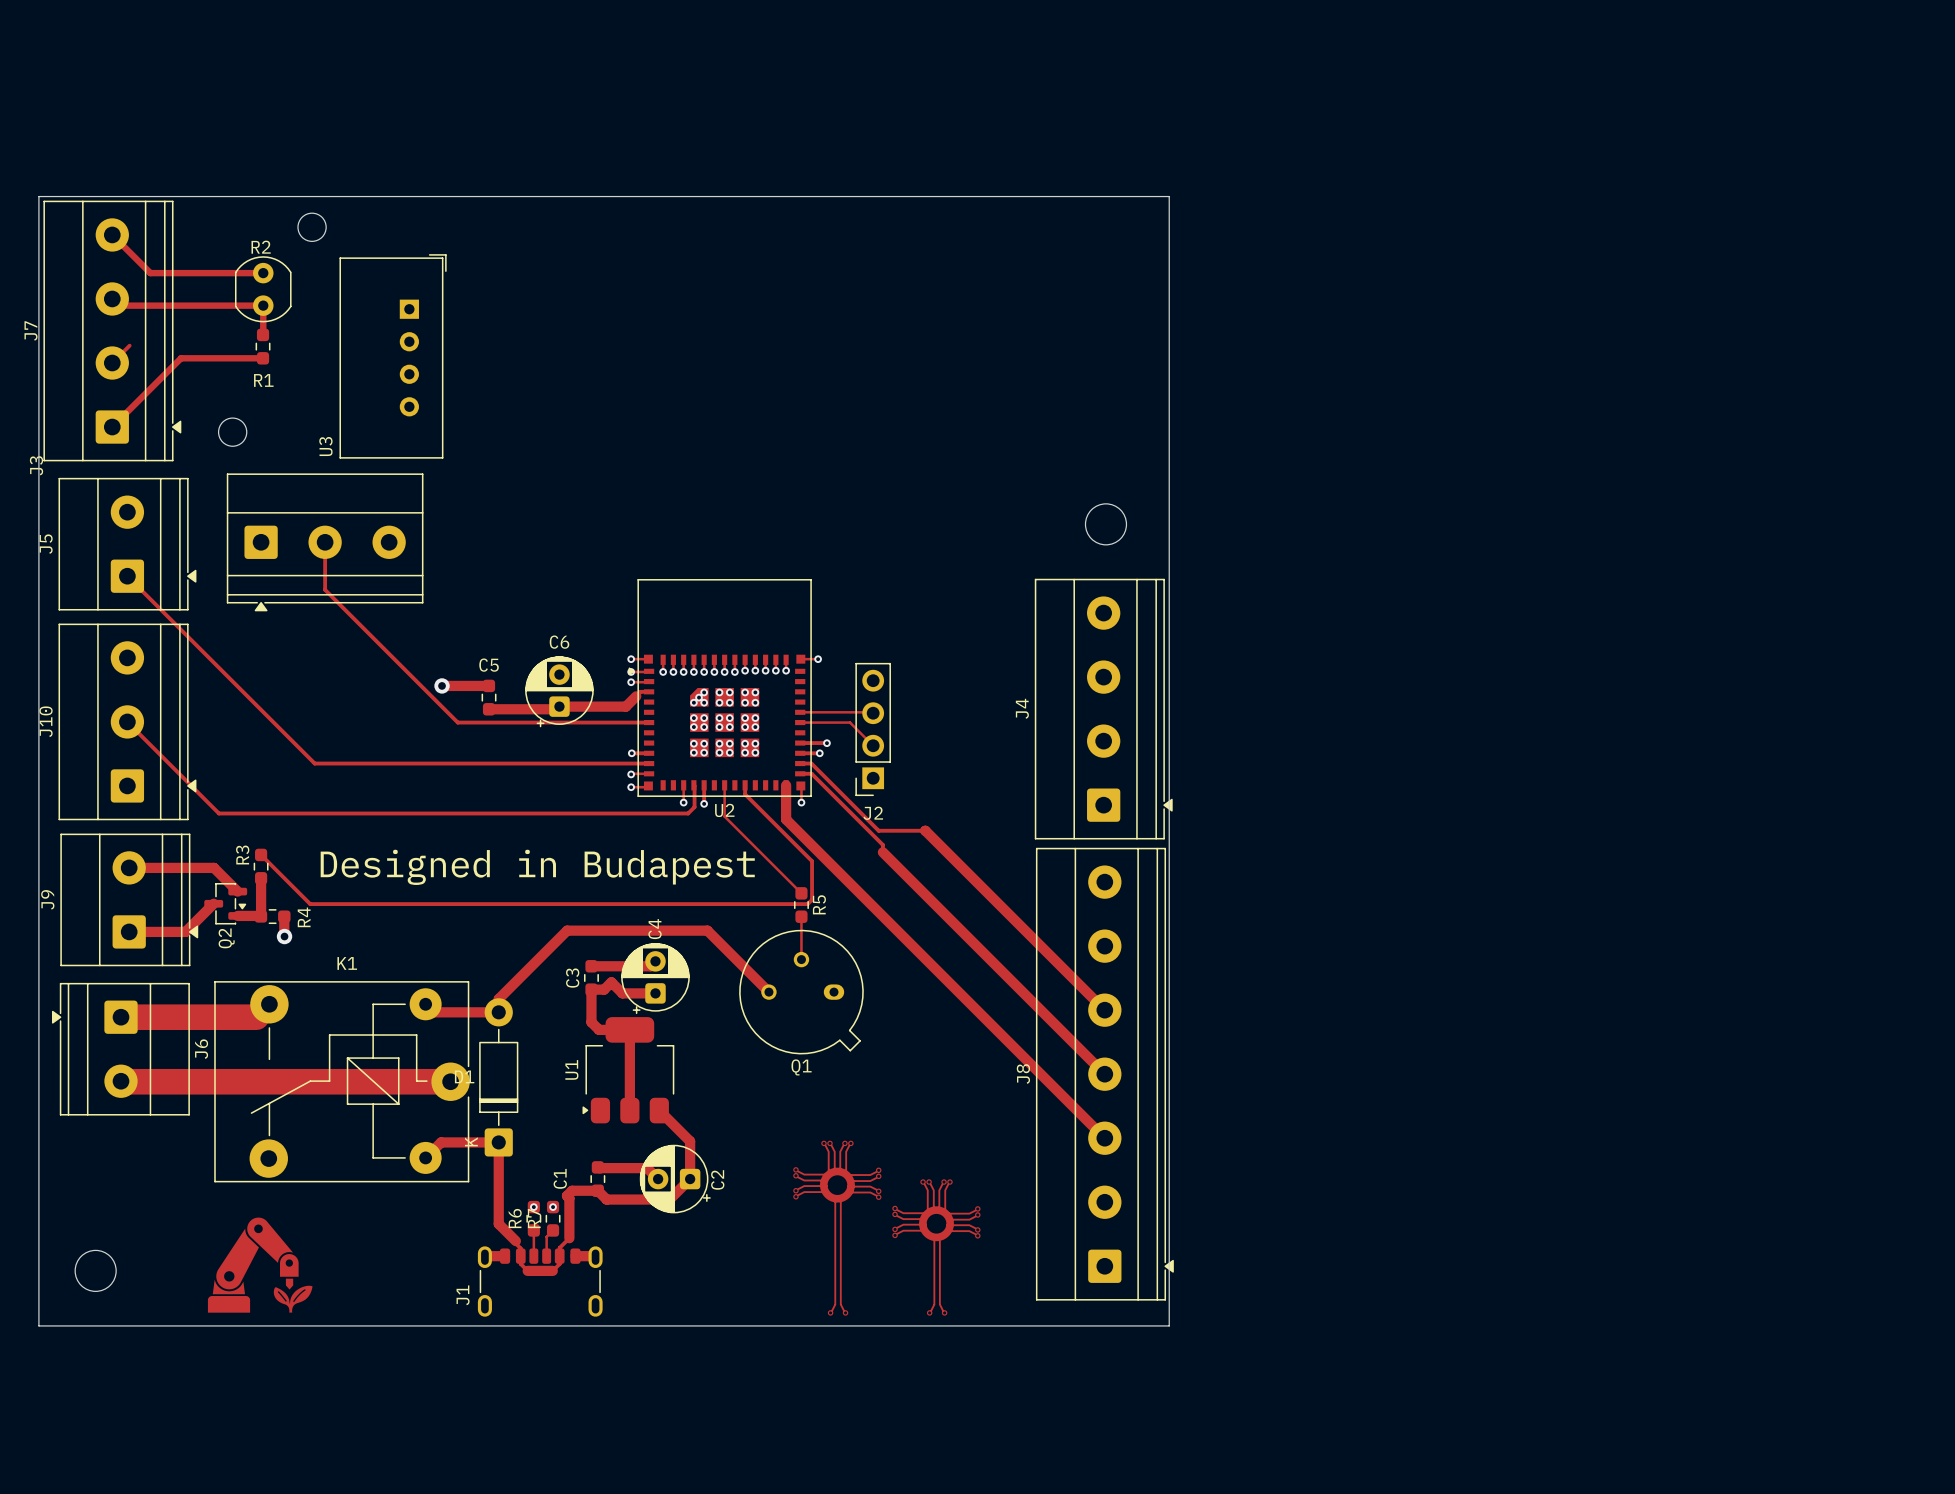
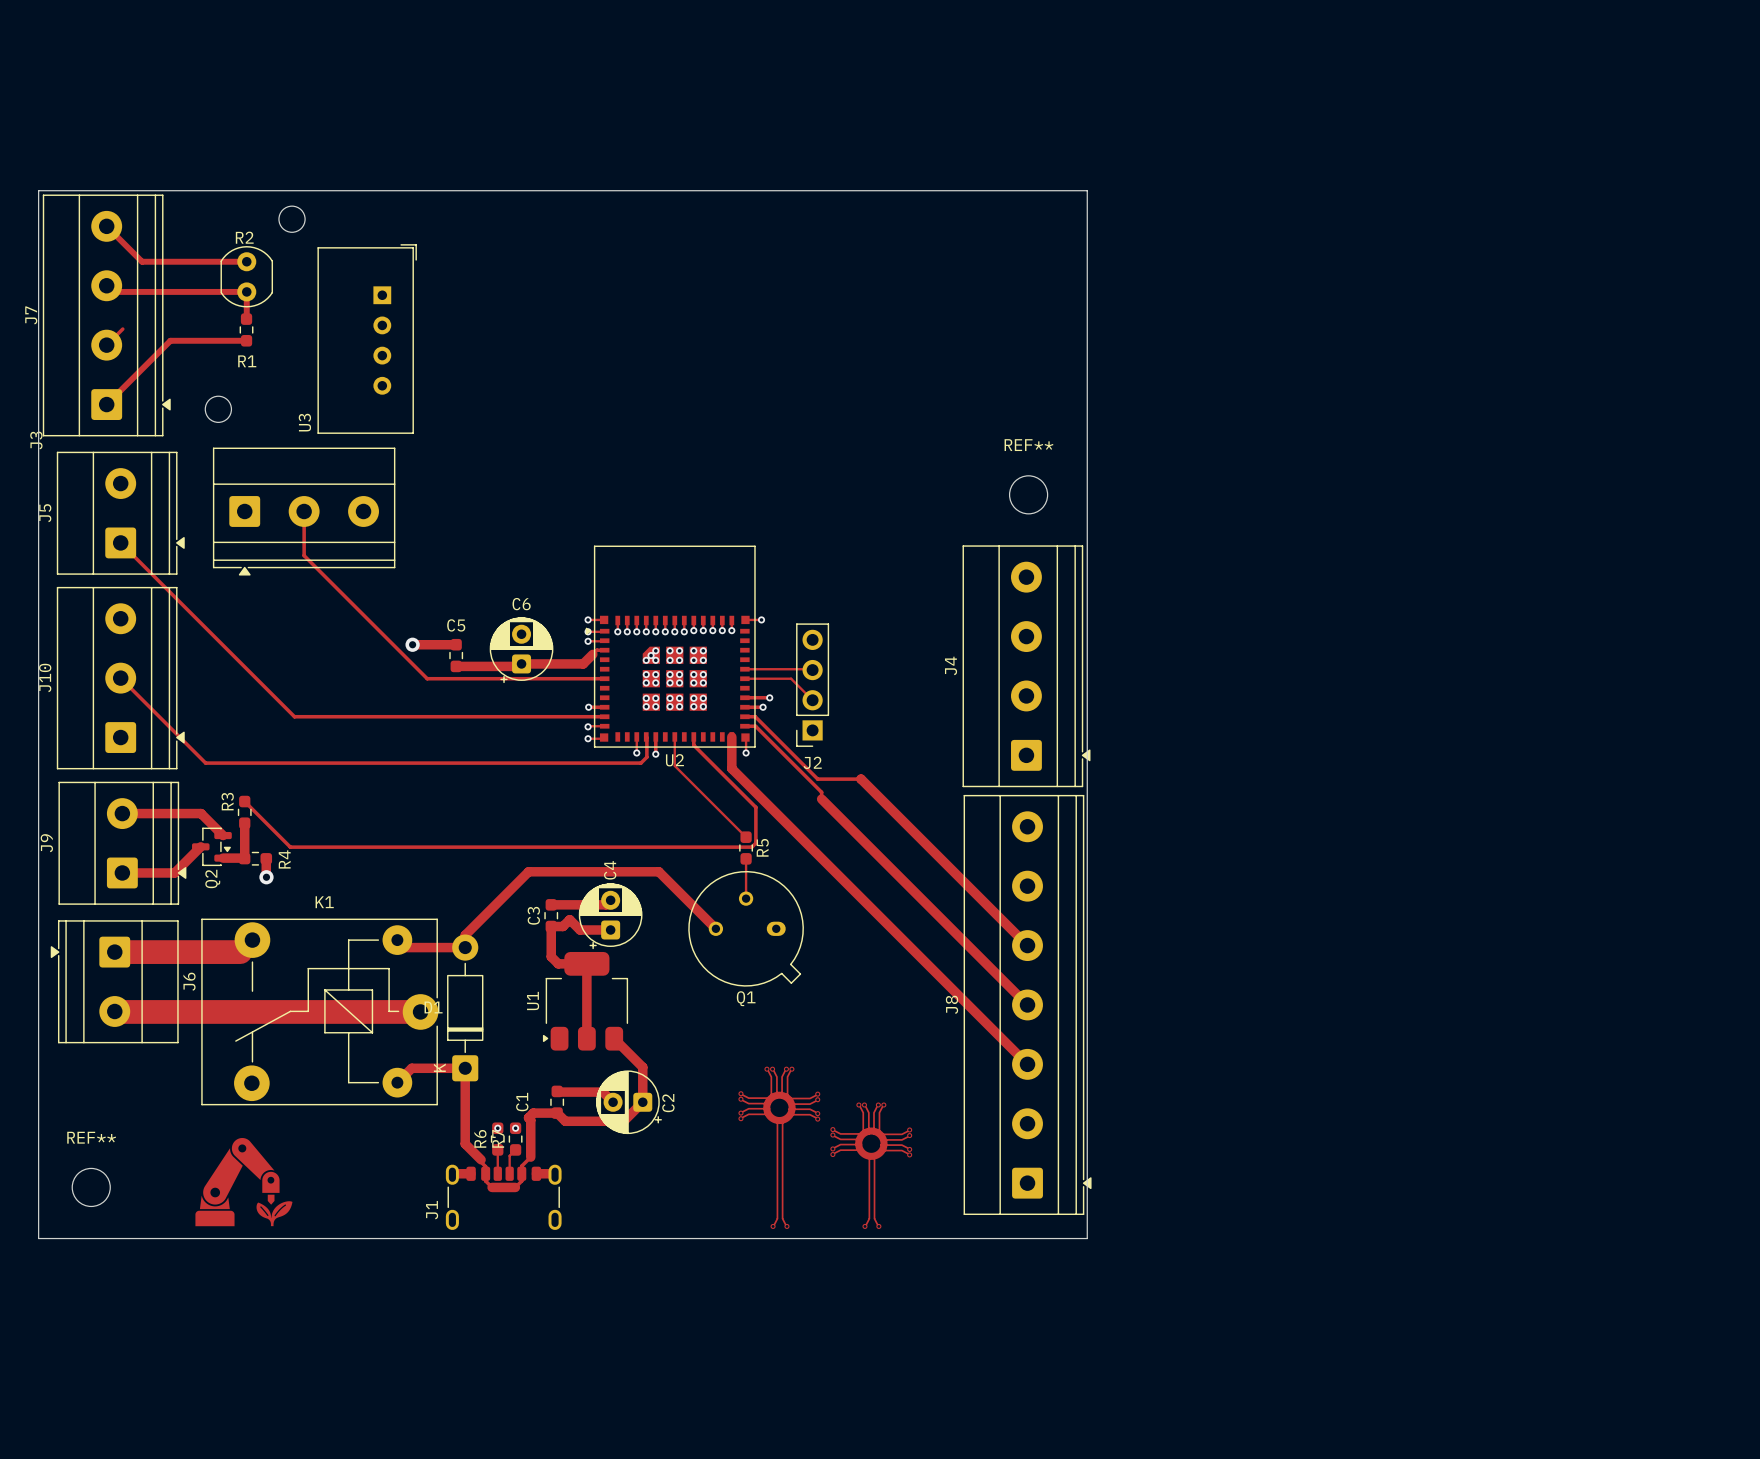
REF** name: none -> REF** (1028, 445)
text: Designed in Budapest (537, 867) -> none
REF** name: none -> REF** (91, 1137)

